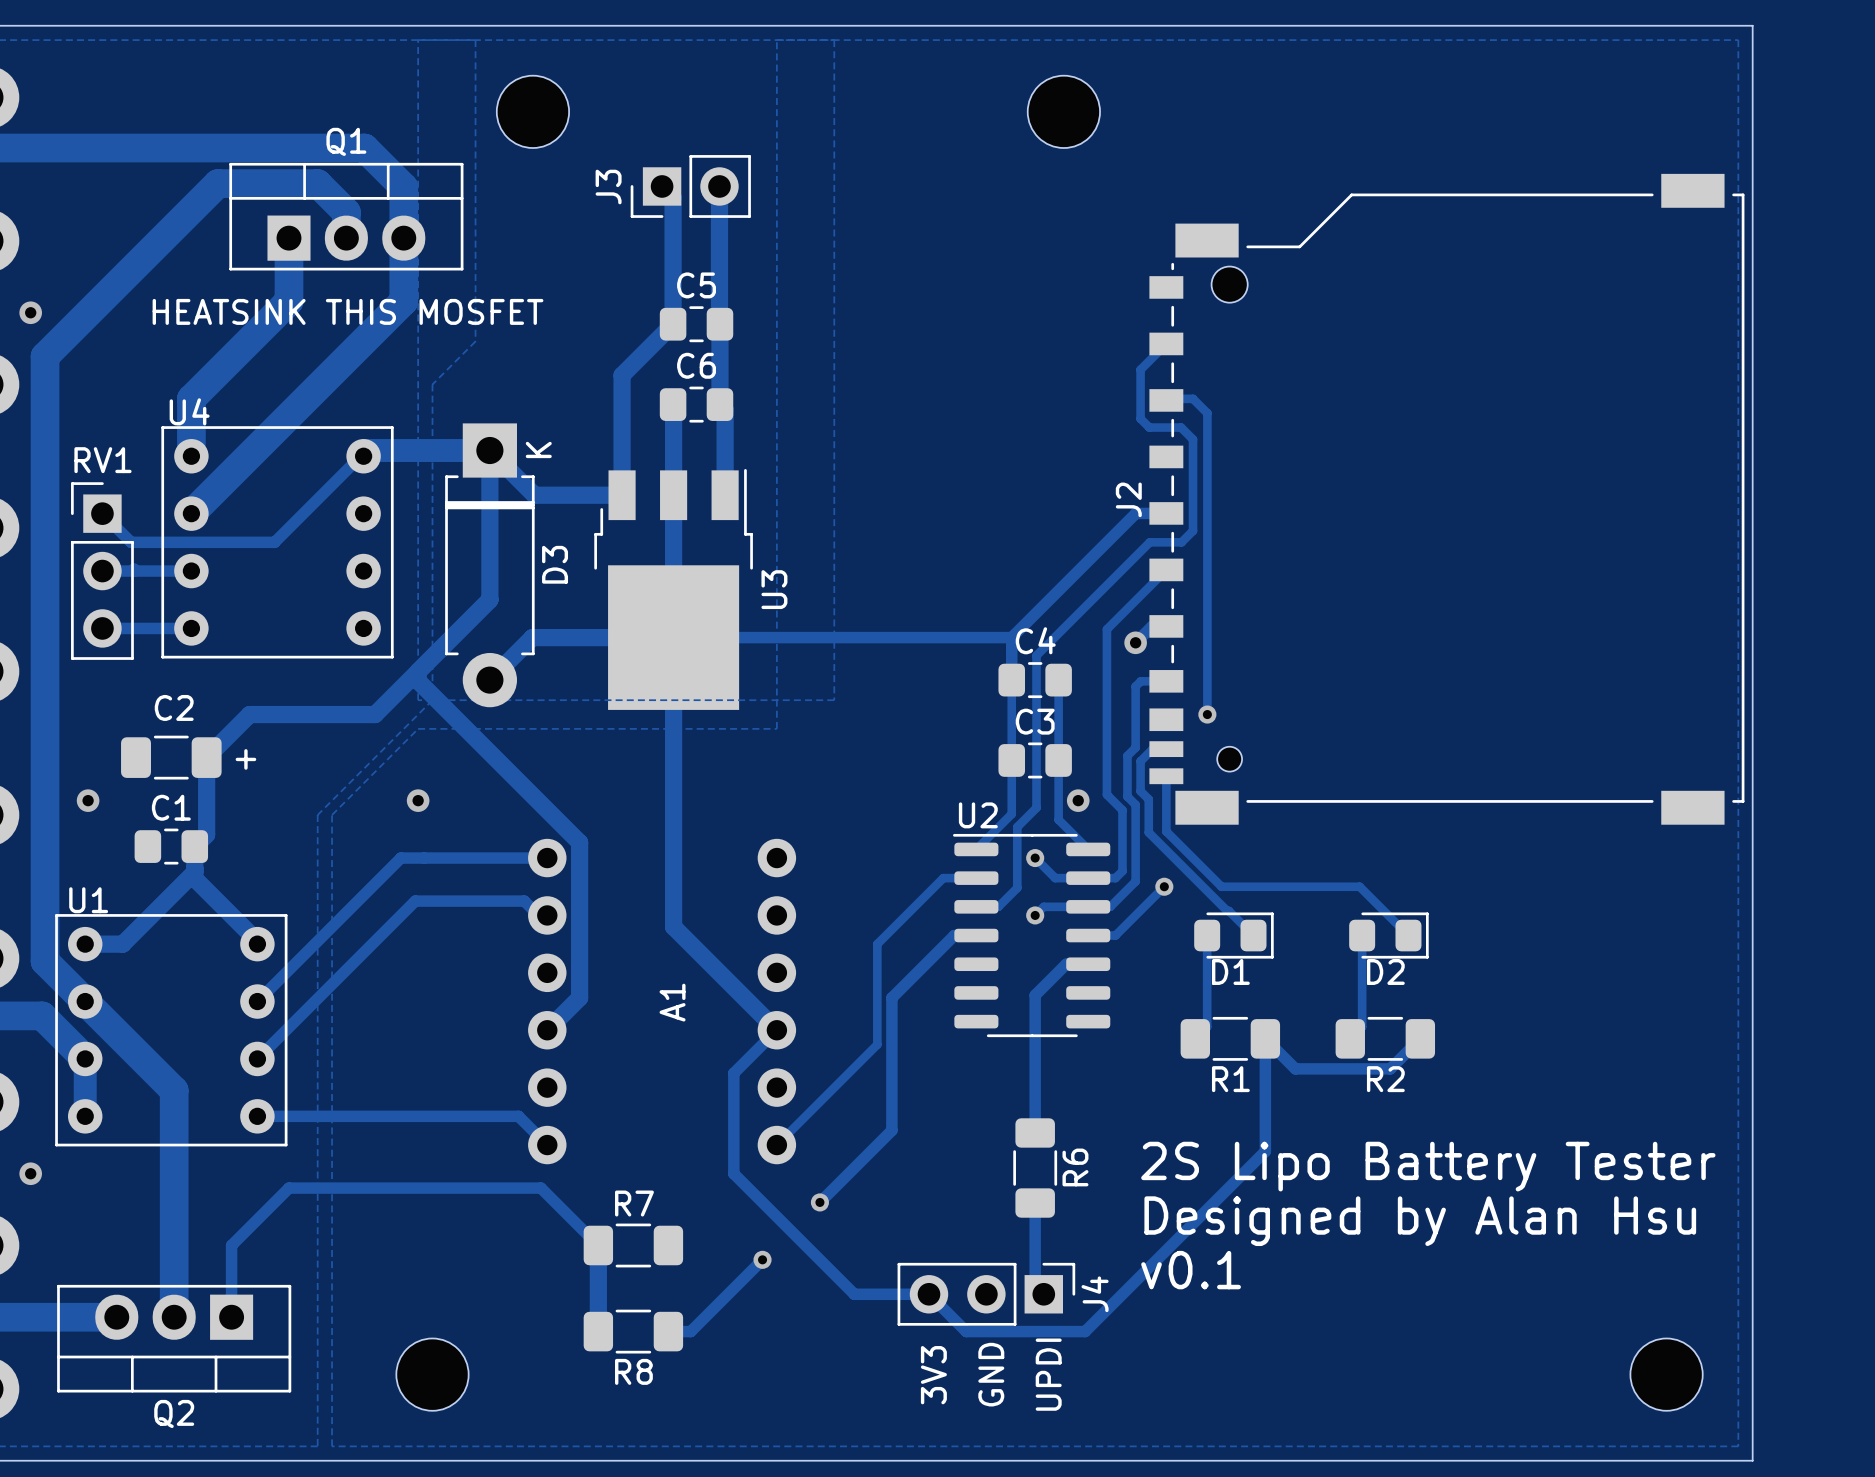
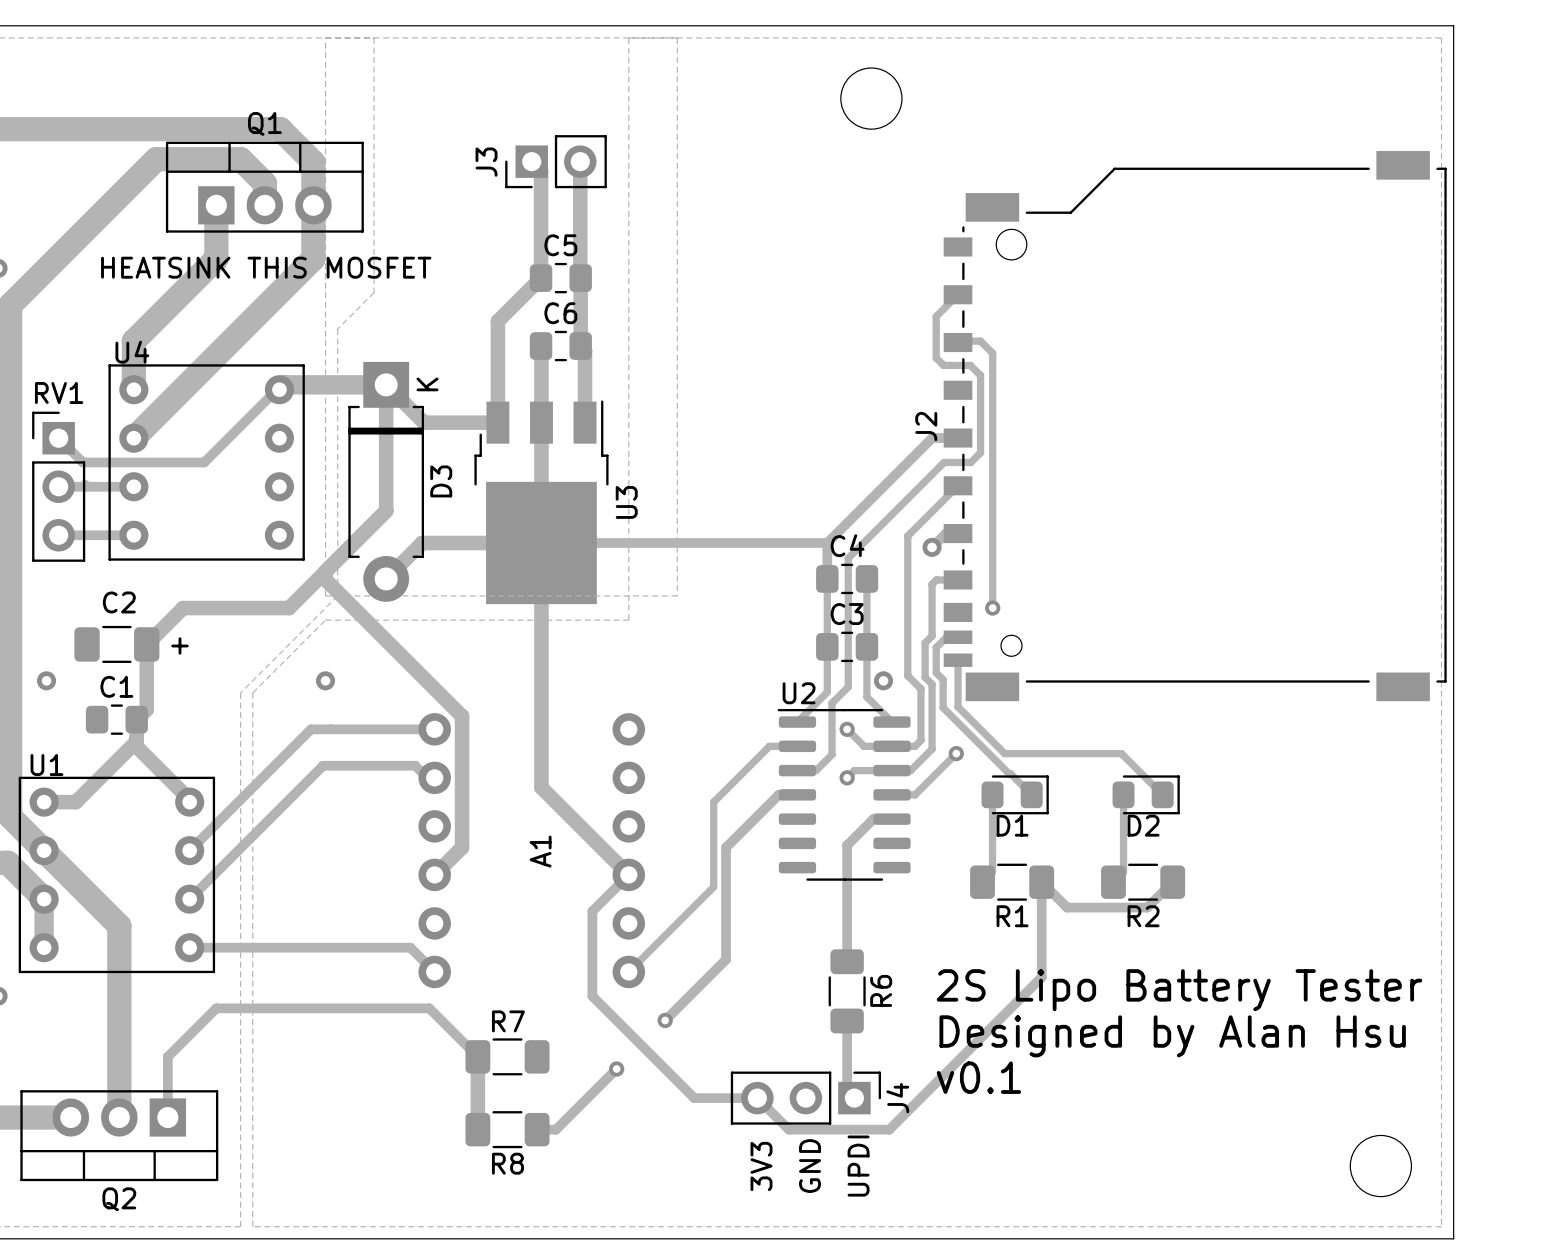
part: (532, 111) -> none
part: (432, 1374) -> none

